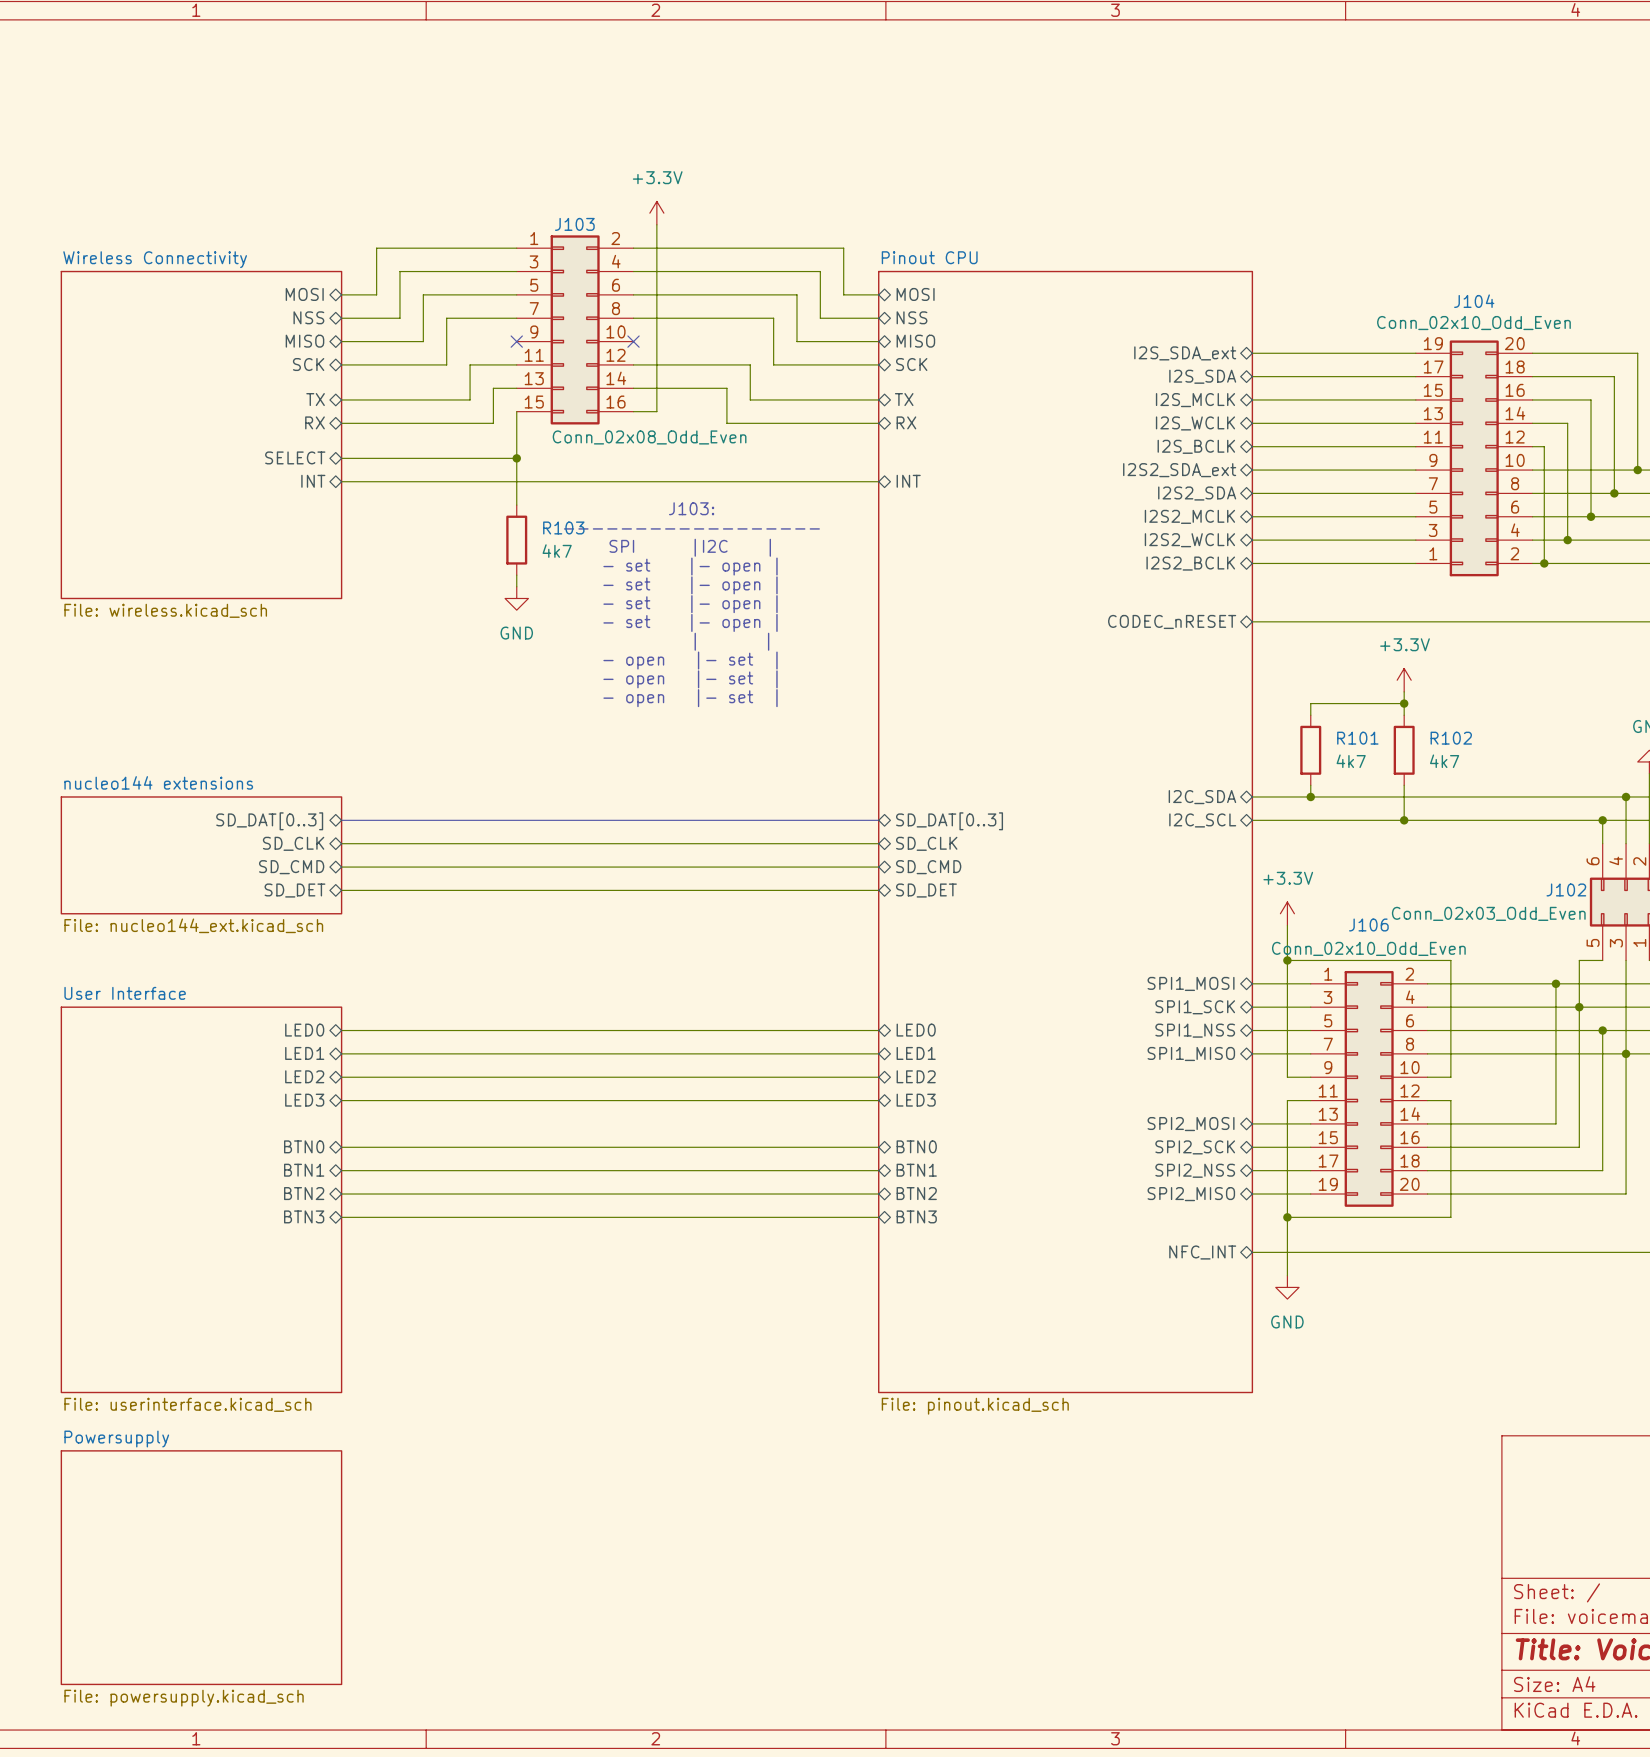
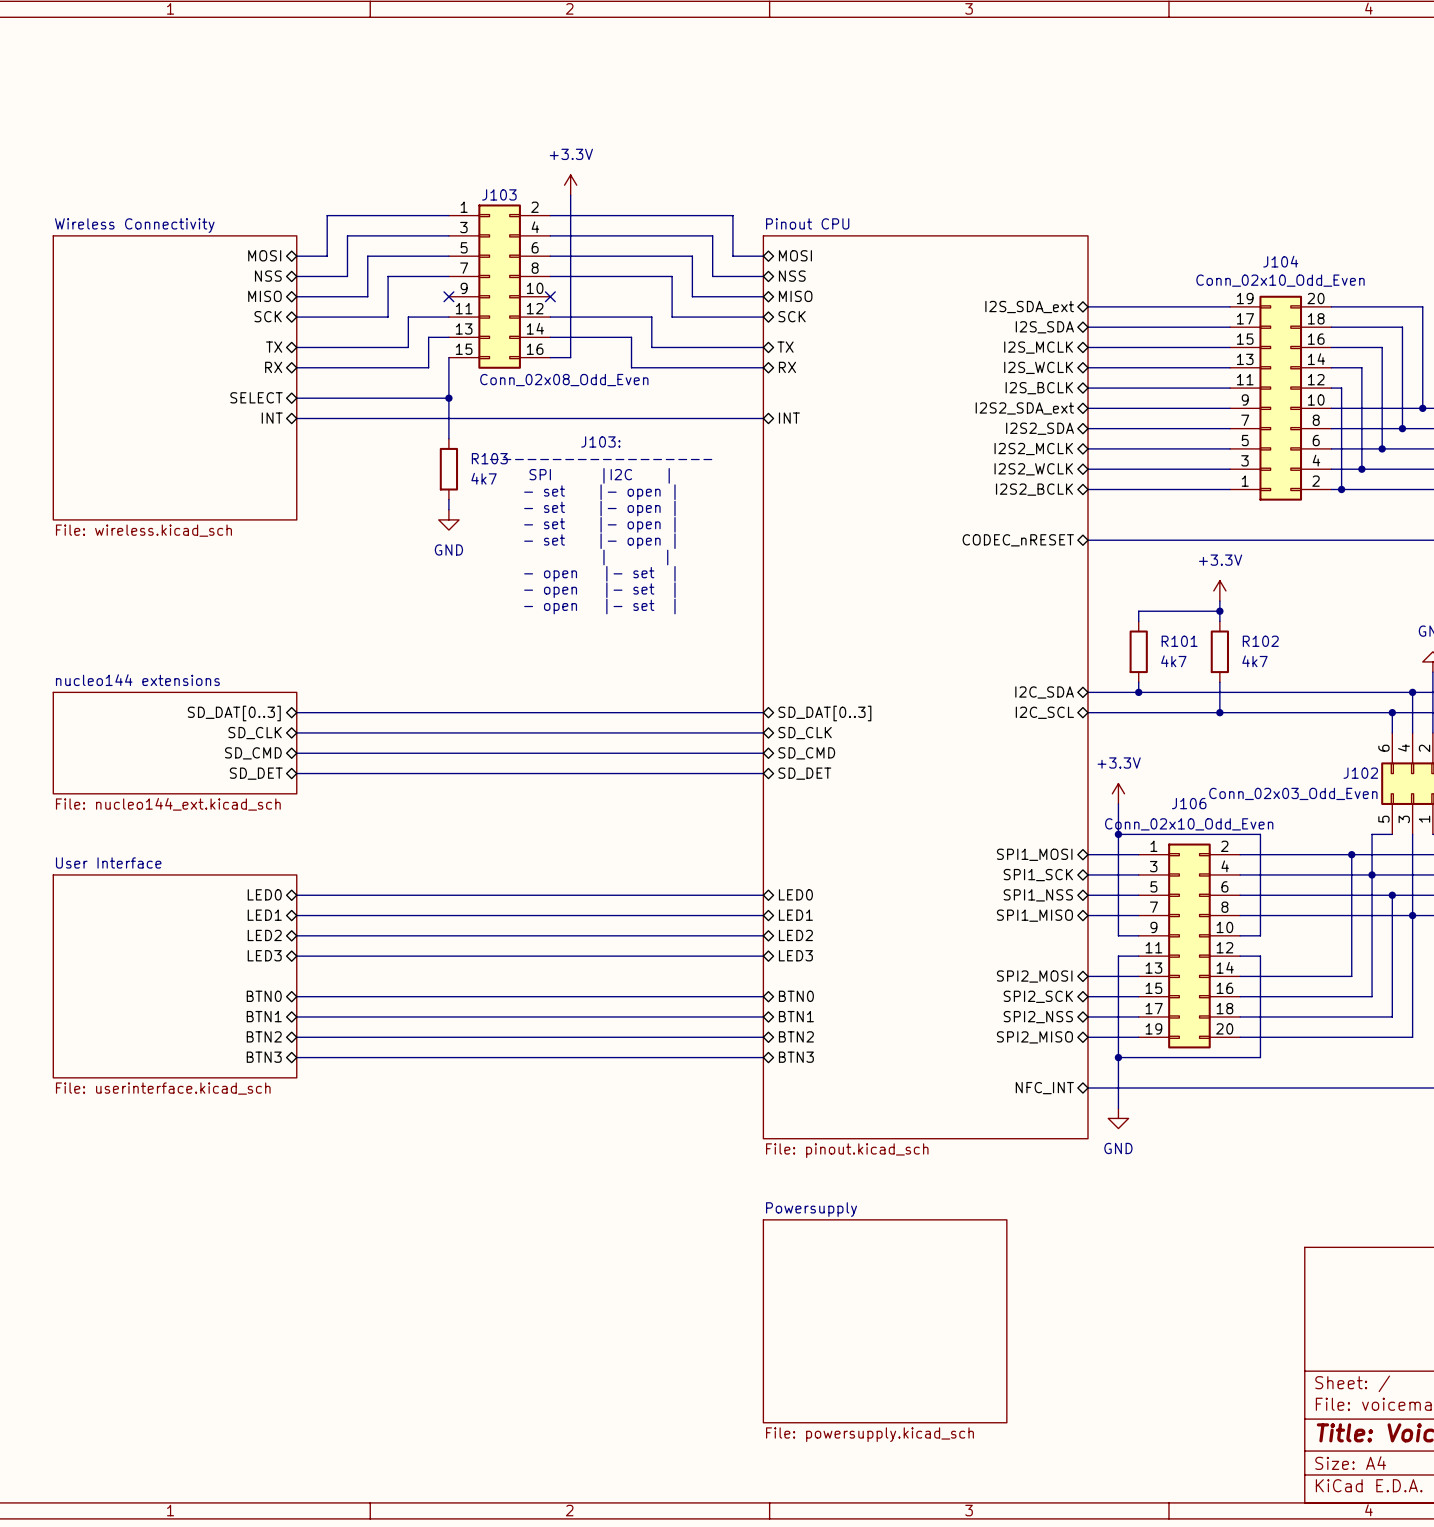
sheet Pinout CPU: none -> File: pinout.kicad_sch (925, 687)
sheet Pinout CPU: File: pinout.kicad_sch (1065, 832) -> none
sheet User Interface: none -> File: userinterface.kicad_sch (175, 976)
sheet User Interface: File: userinterface.kicad_sch (201, 1199) -> none
sheet Powersupply: none -> File: powersupply.kicad_sch (885, 1321)
sheet Powersupply: File: powersupply.kicad_sch (201, 1567) -> none

